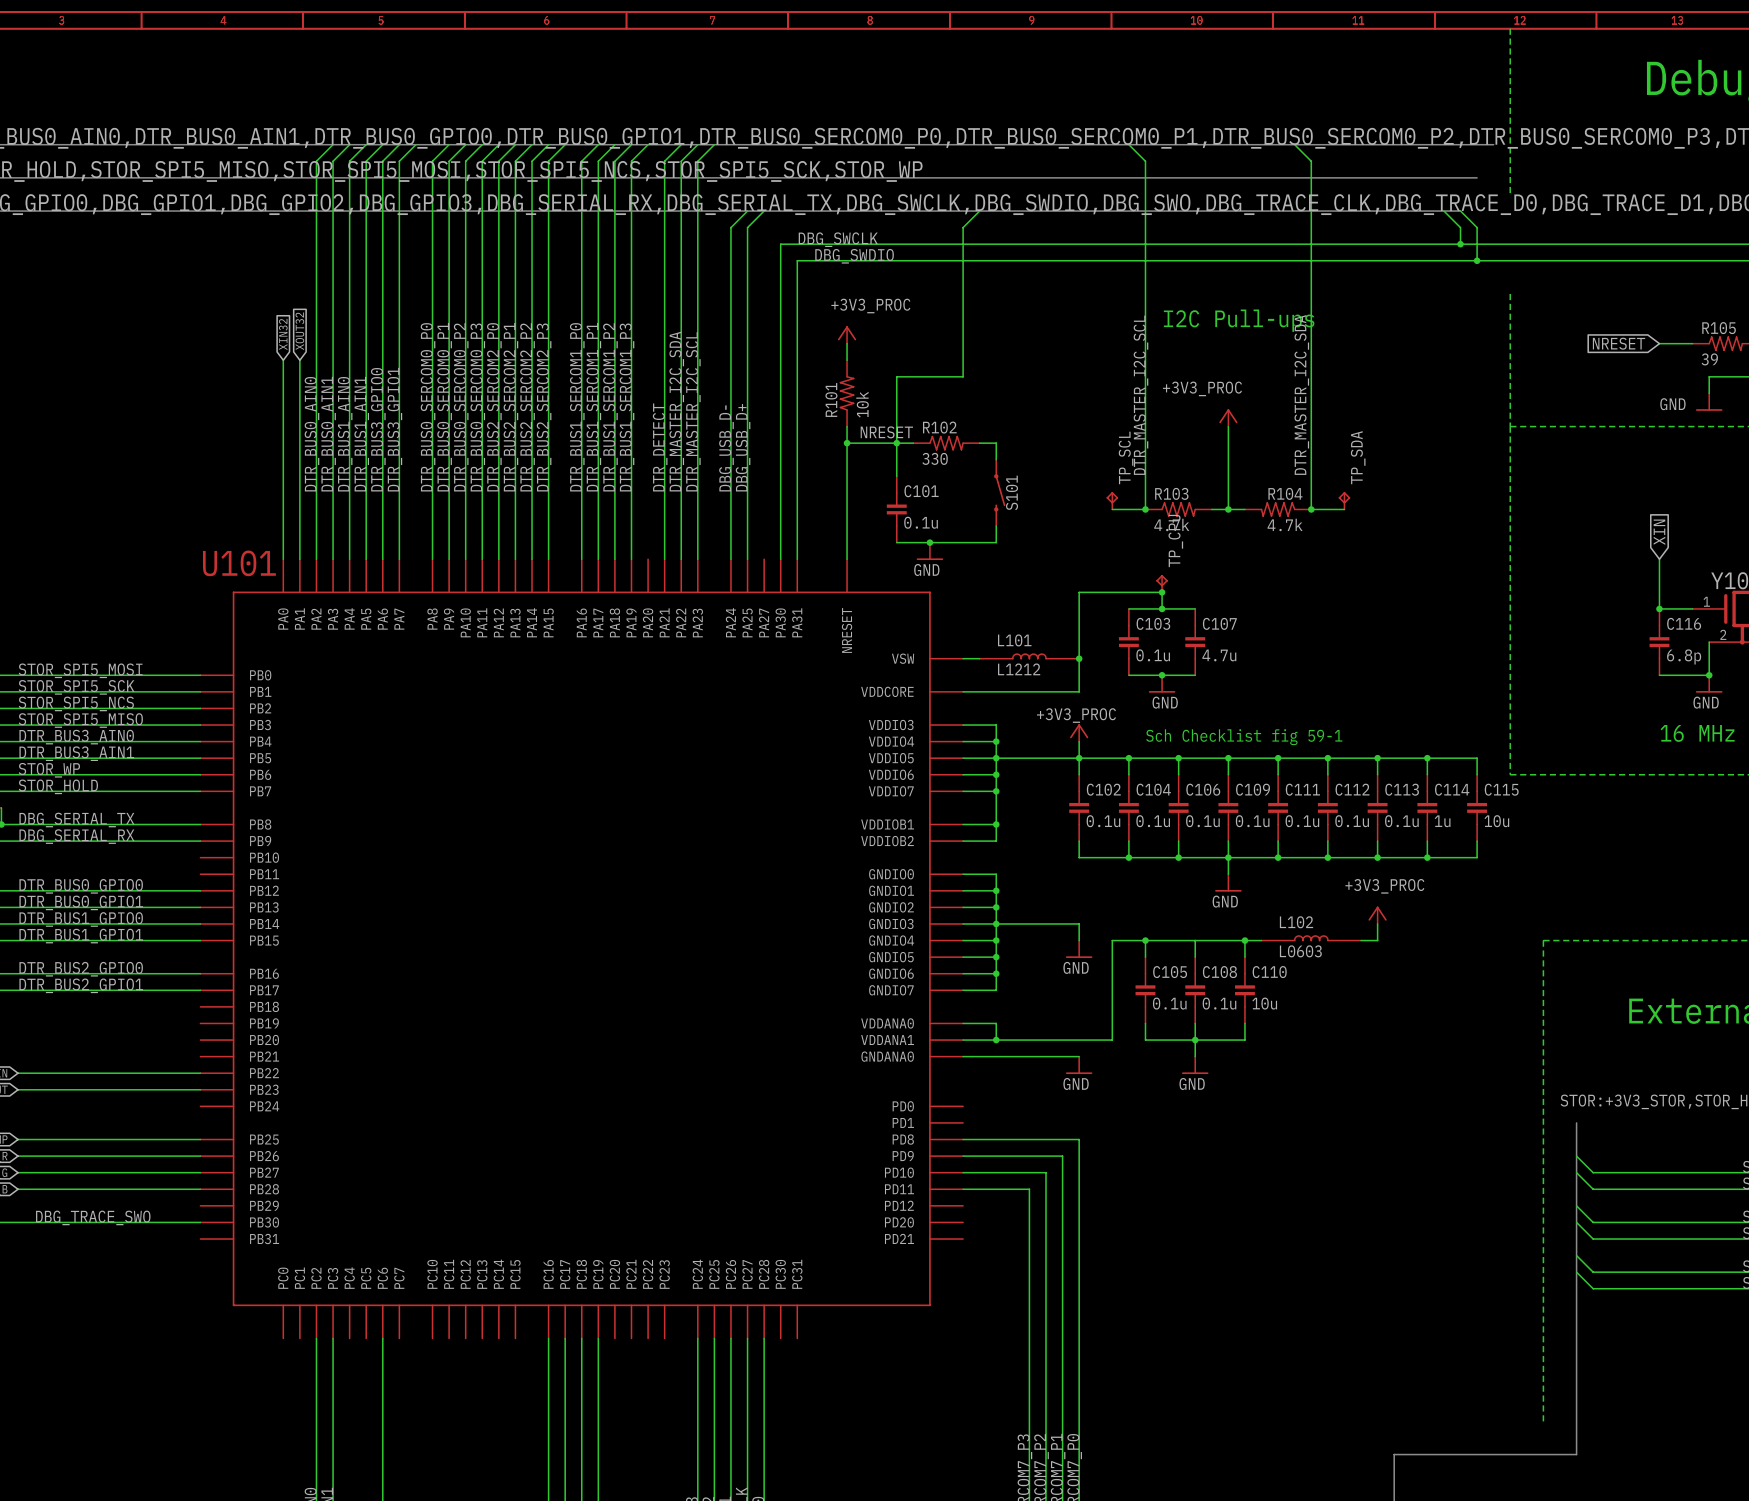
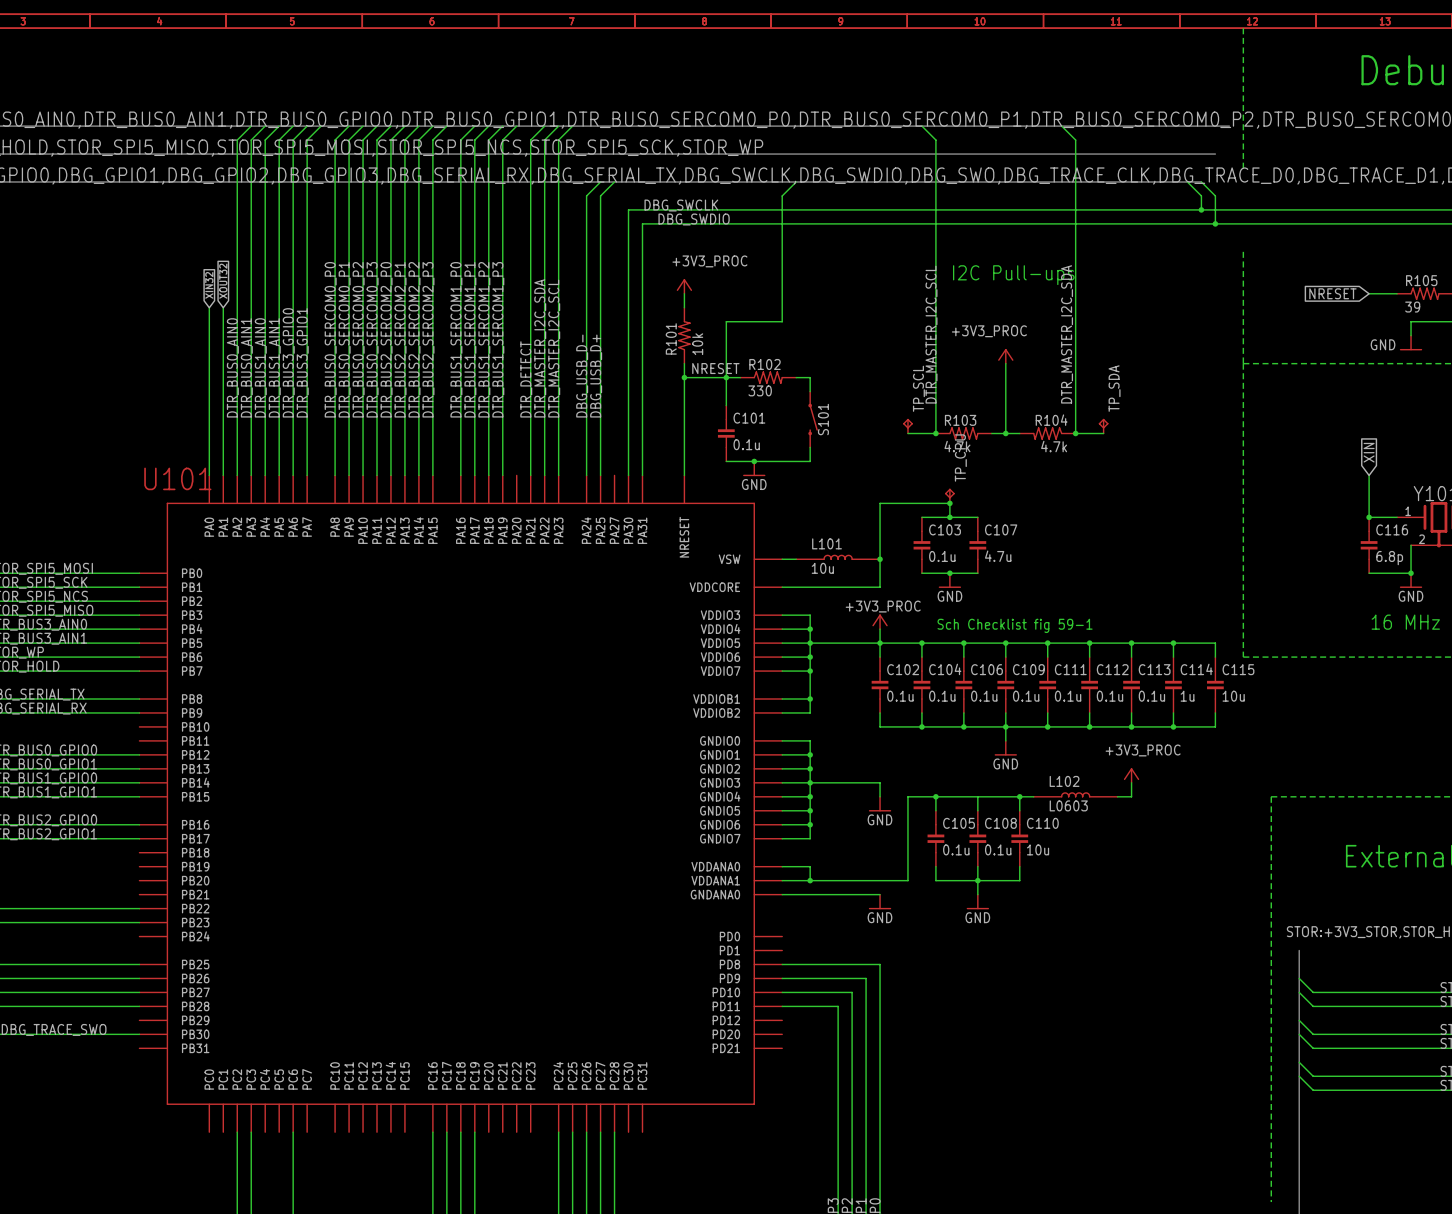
L101 value: L1212 (1019, 669) -> 10u (822, 568)

